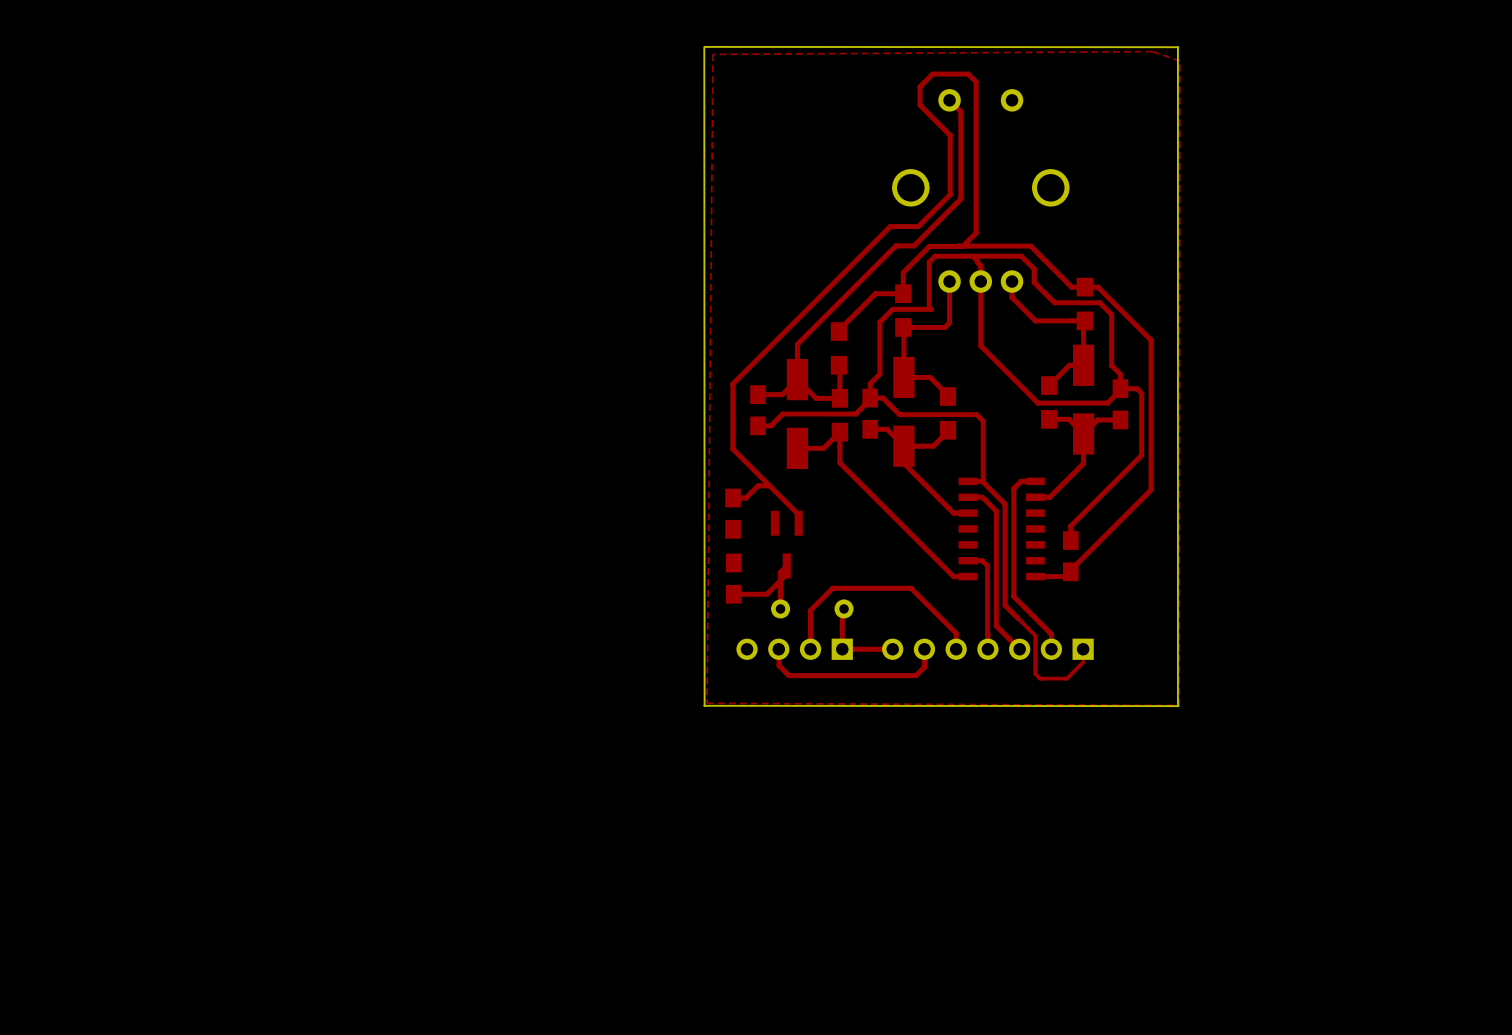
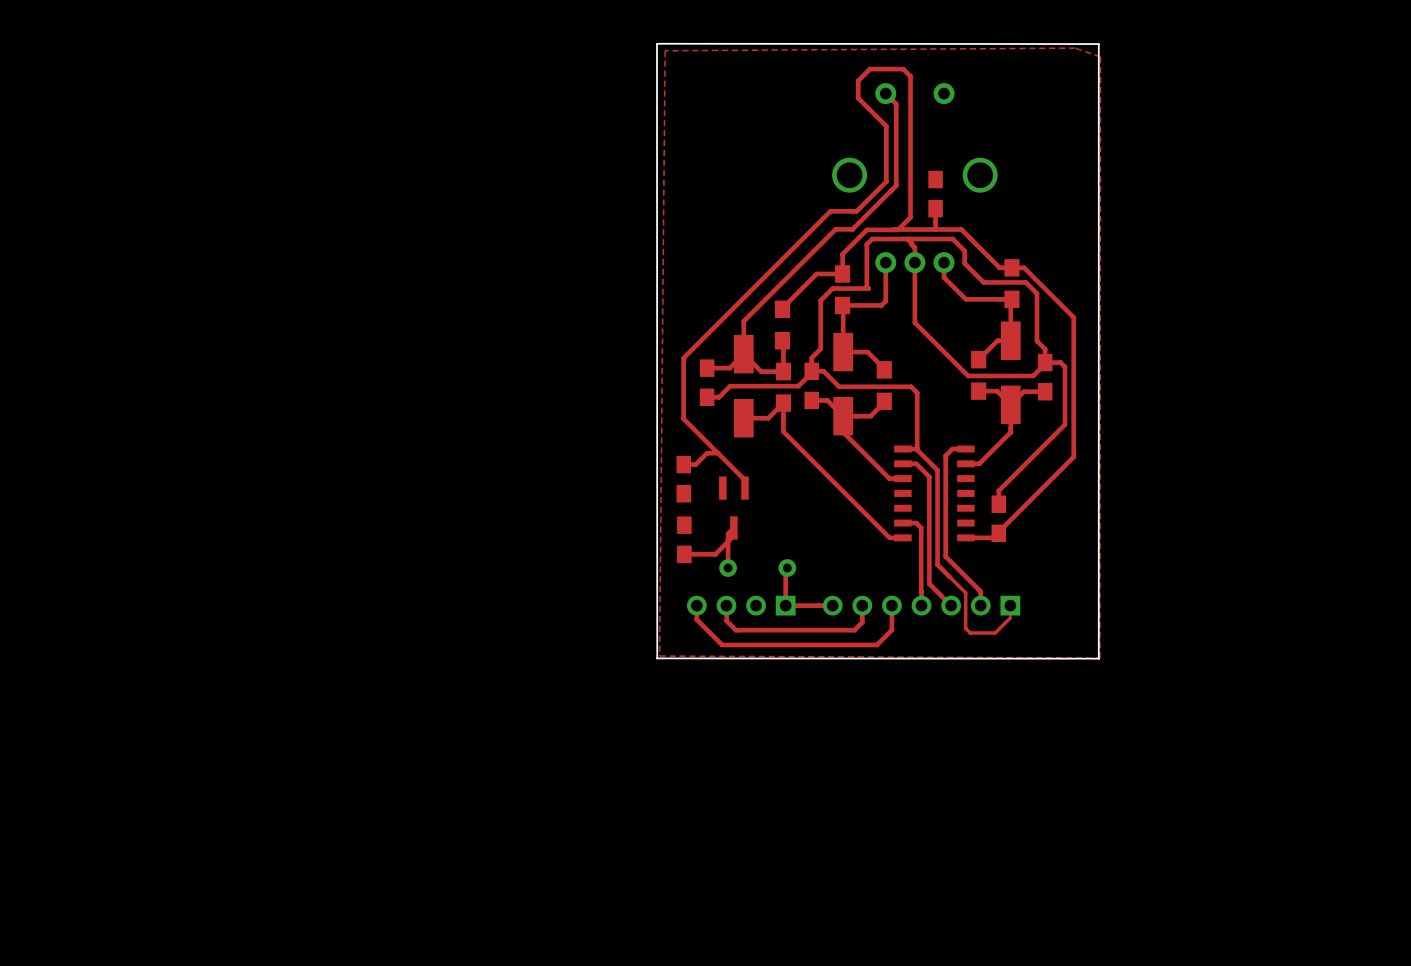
part: none -> (935, 194)
top track: none -> (935, 208) (935, 229)
top track: (956, 649) (956, 633) (911, 588) (832, 588) (810, 610) (810, 649) -> (891, 605) (891, 630) (877, 644) (722, 644) (696, 619) (696, 605)

